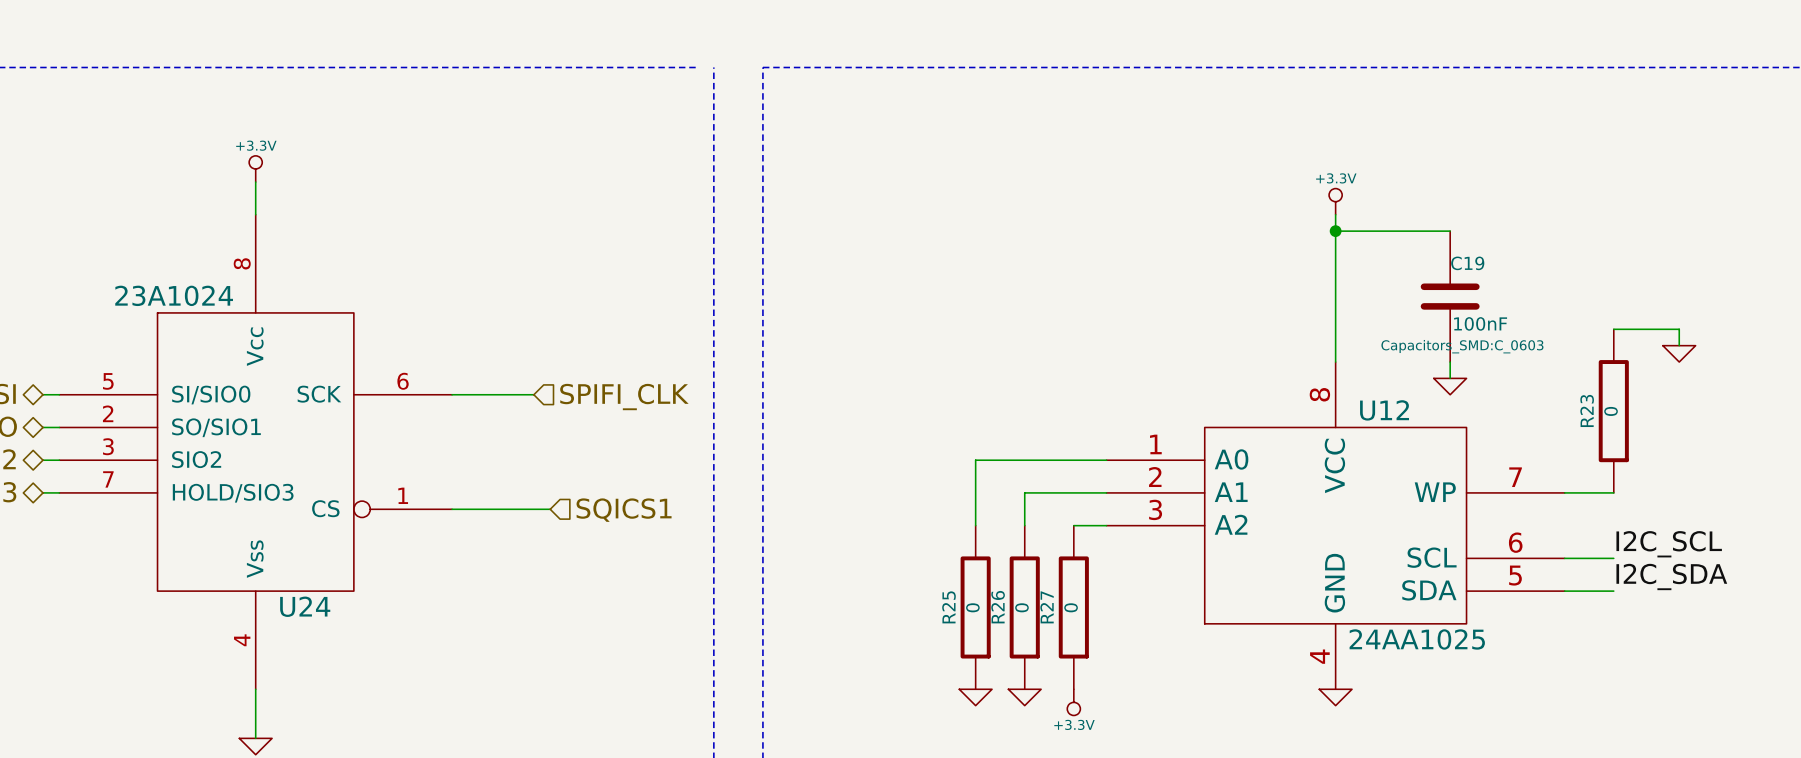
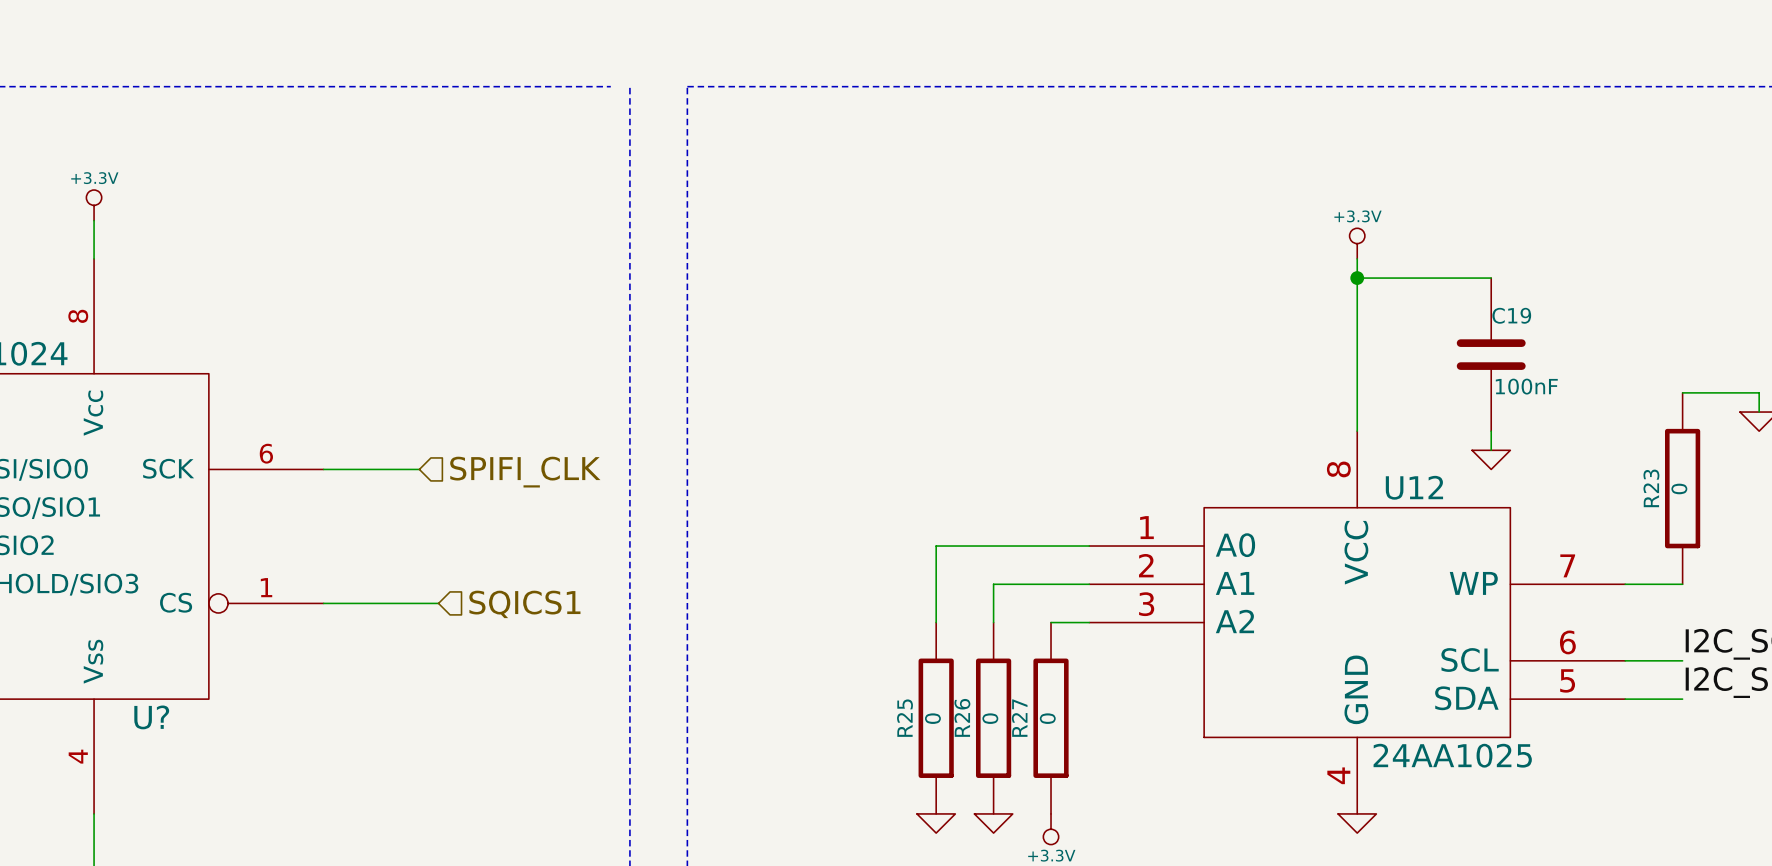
C19 text: Capacitors_SMD:C_0603 (1462, 346) -> none
U24 name: U24 (305, 606) -> U? (151, 717)

